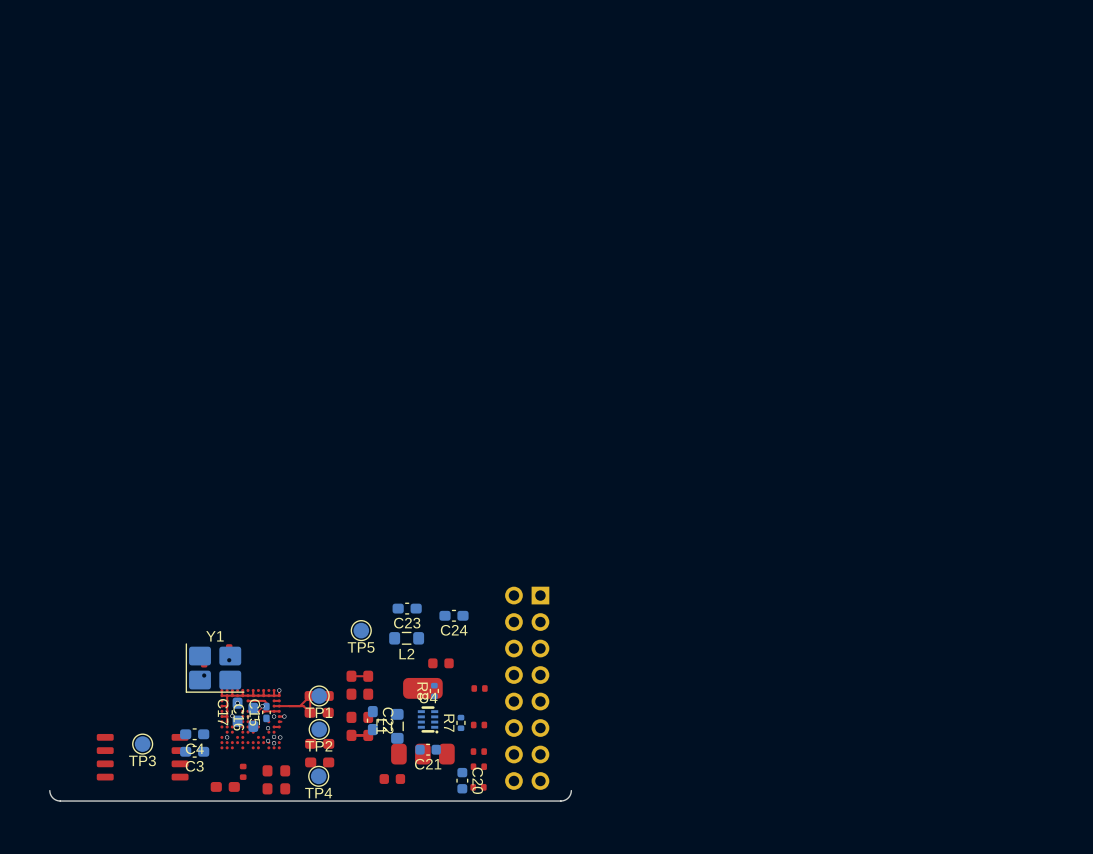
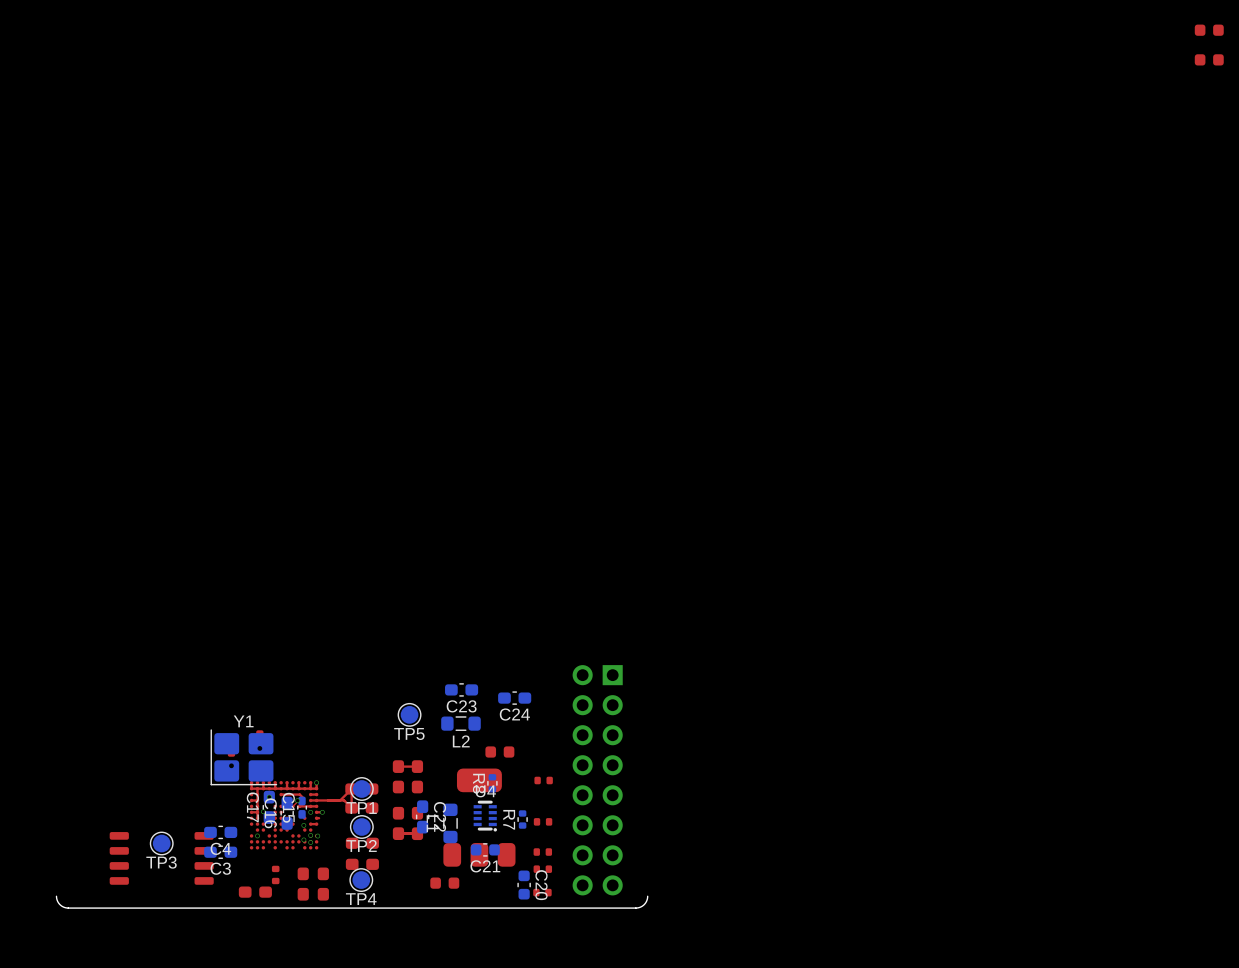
part: none -> (1209, 30)
part: none -> (1209, 59)

